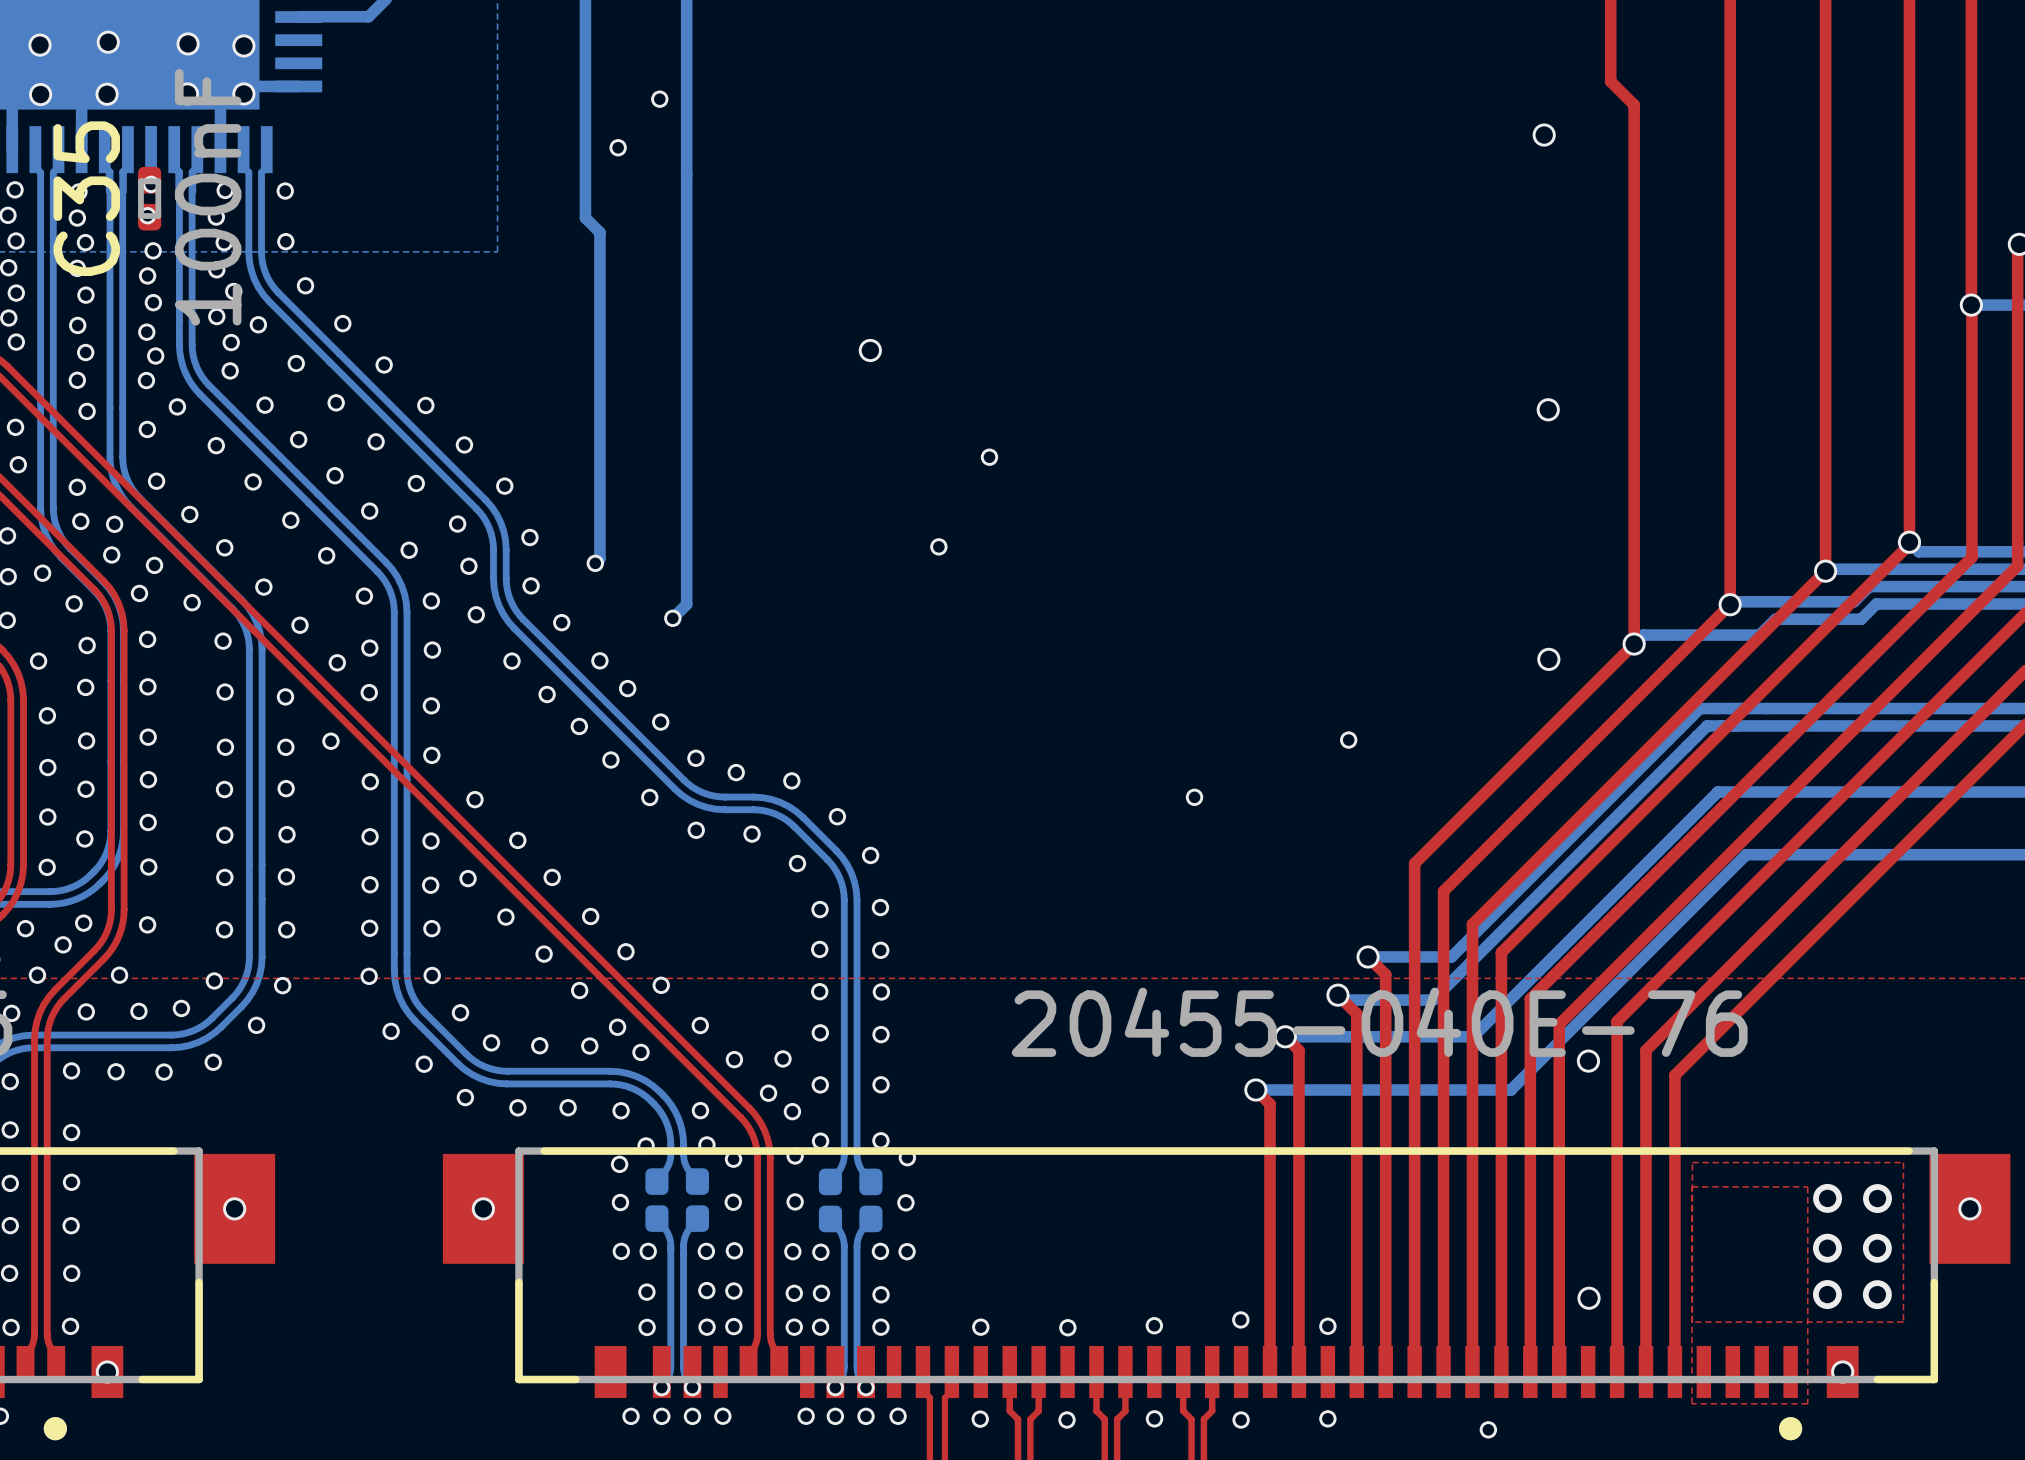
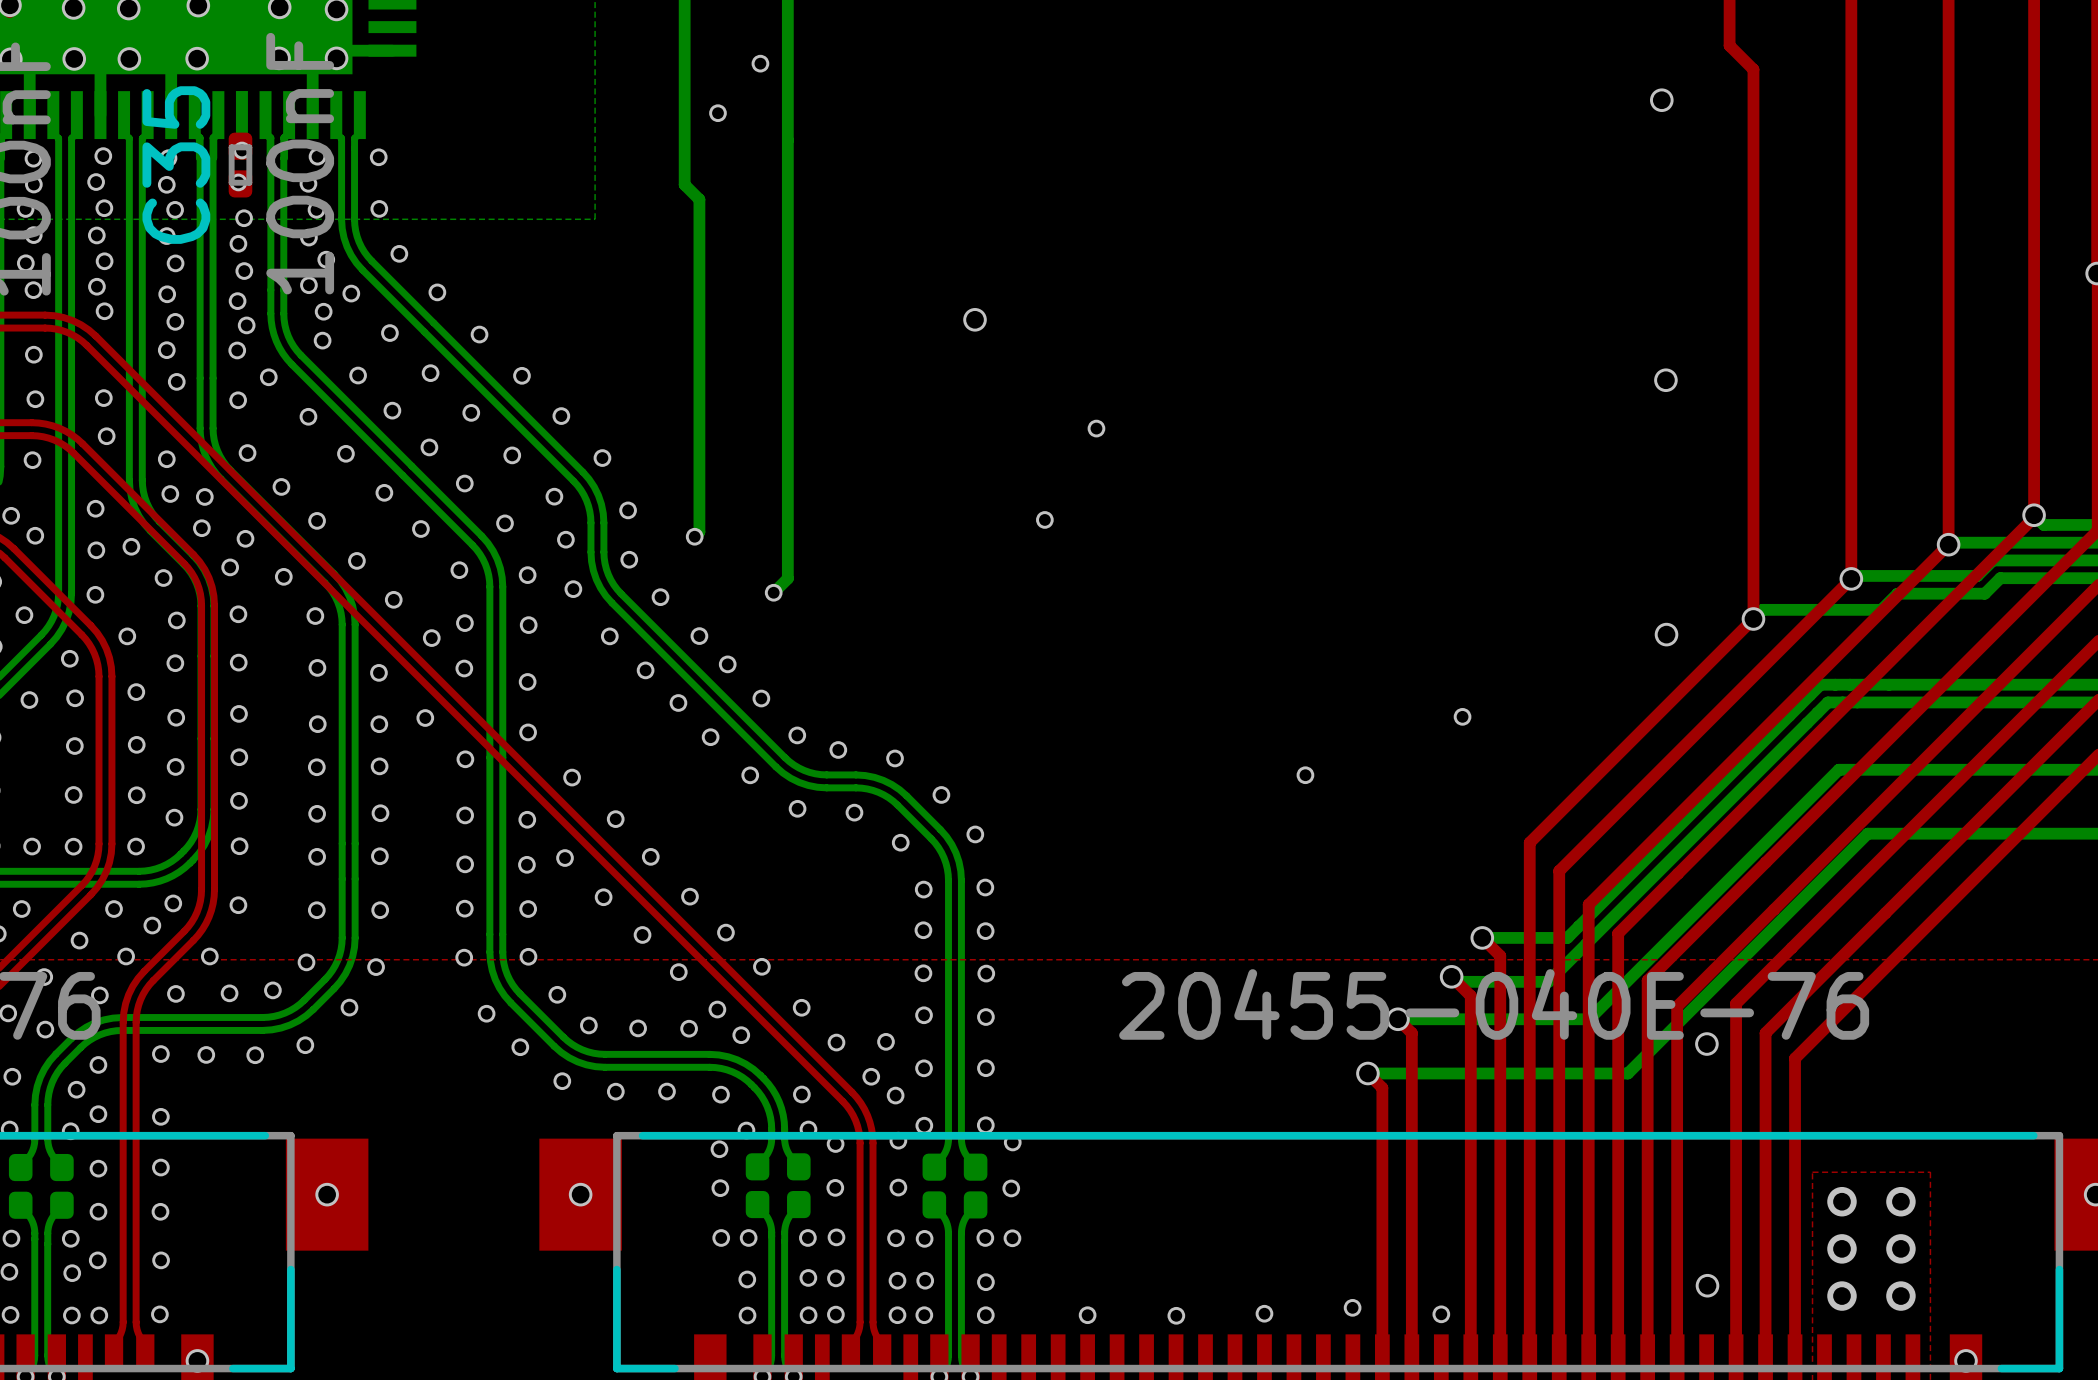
top zone outline: (1692, 1162) (1692, 1322) (1903, 1322) (1903, 1162) (1692, 1162) -> none
via: (1827, 1198) -> none
via: (1877, 1198) -> none
via: none -> (1841, 1201)
via: none -> (1900, 1201)
via: (1827, 1248) -> none
via: (1877, 1248) -> none
via: none -> (1841, 1248)
via: none -> (1900, 1248)
via: (1827, 1294) -> none
via: (1877, 1294) -> none
via: none -> (1841, 1296)
via: none -> (1900, 1296)

